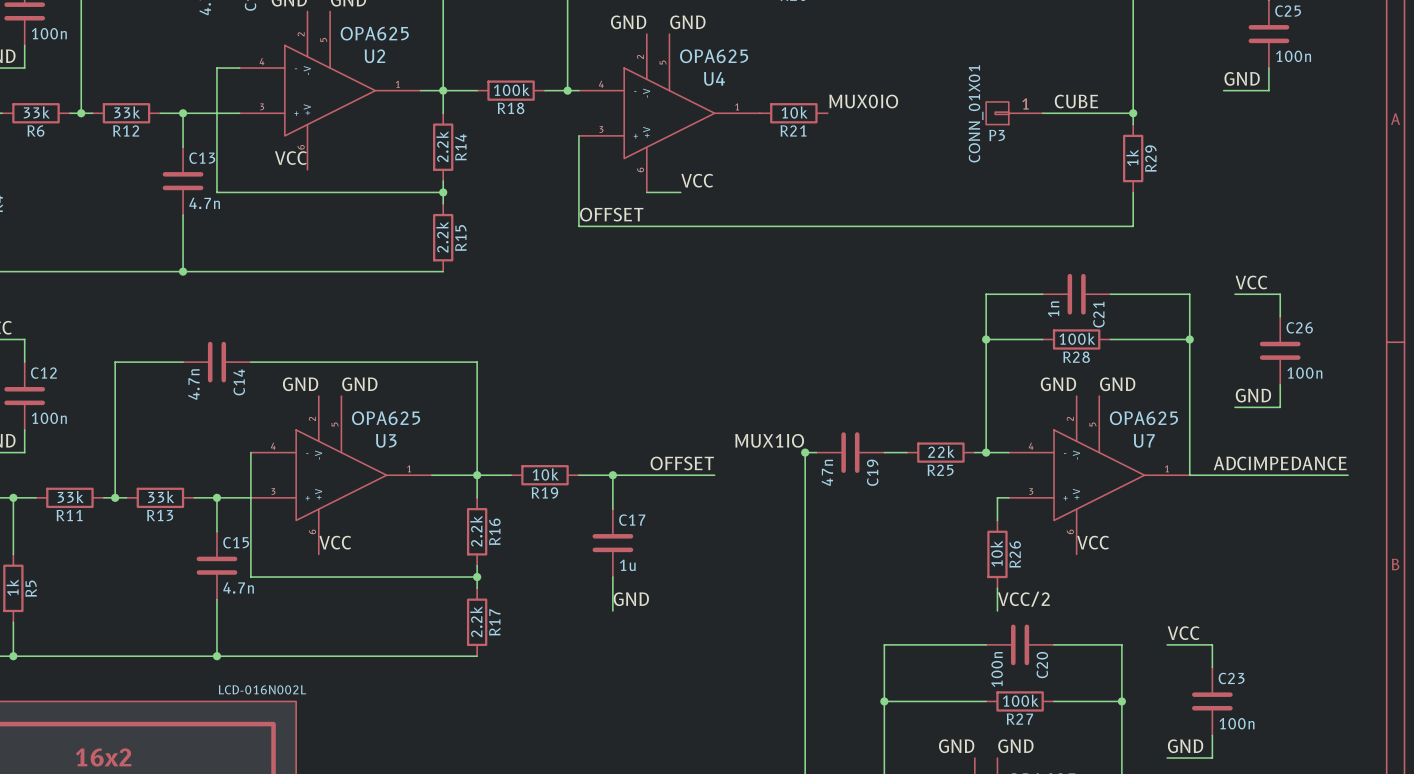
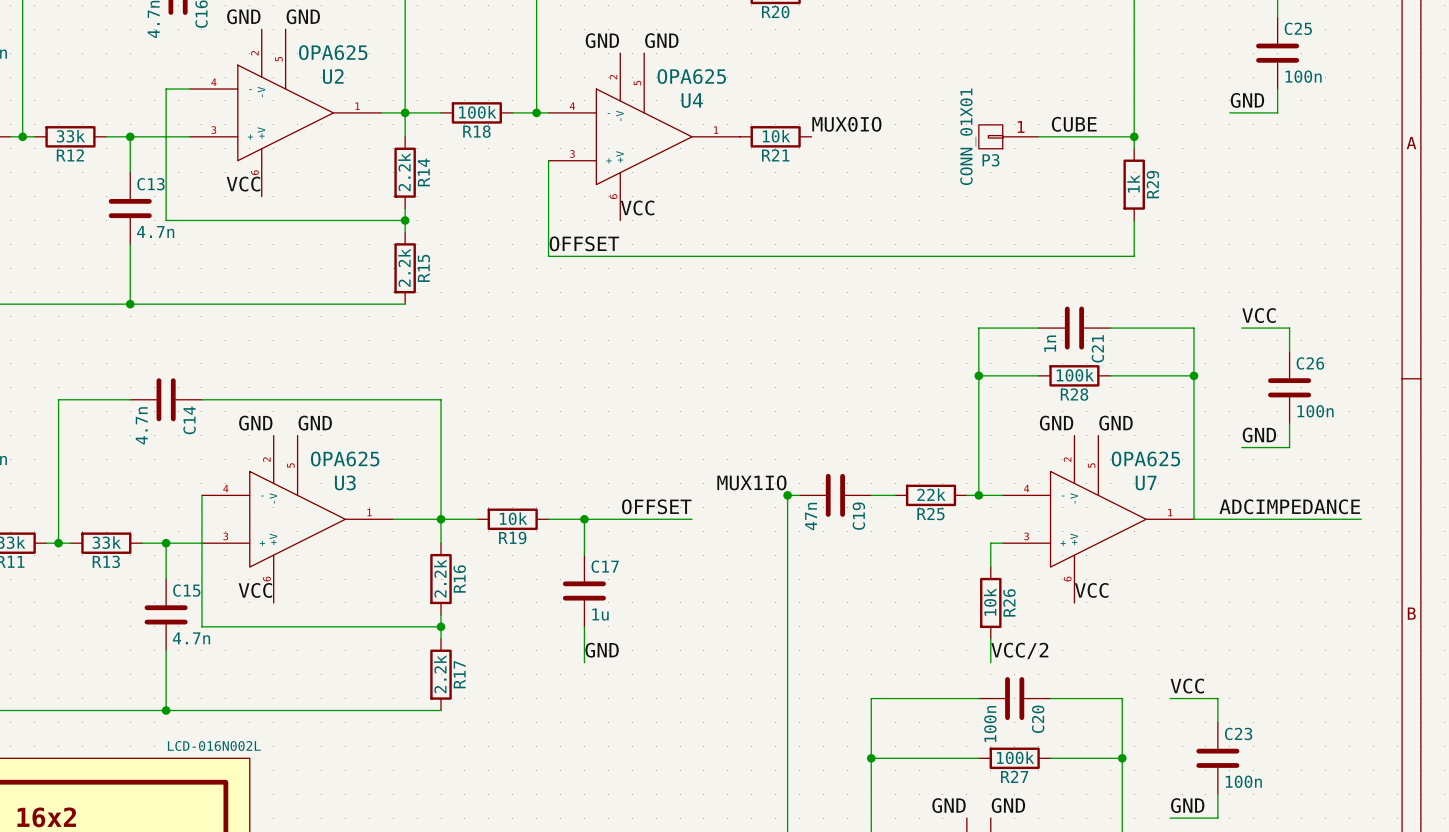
label position: VCC (697, 180) -> VCC (637, 207)
wire: (646, 192) (680, 192) -> none
label position: VCC (335, 542) -> VCC (255, 590)

